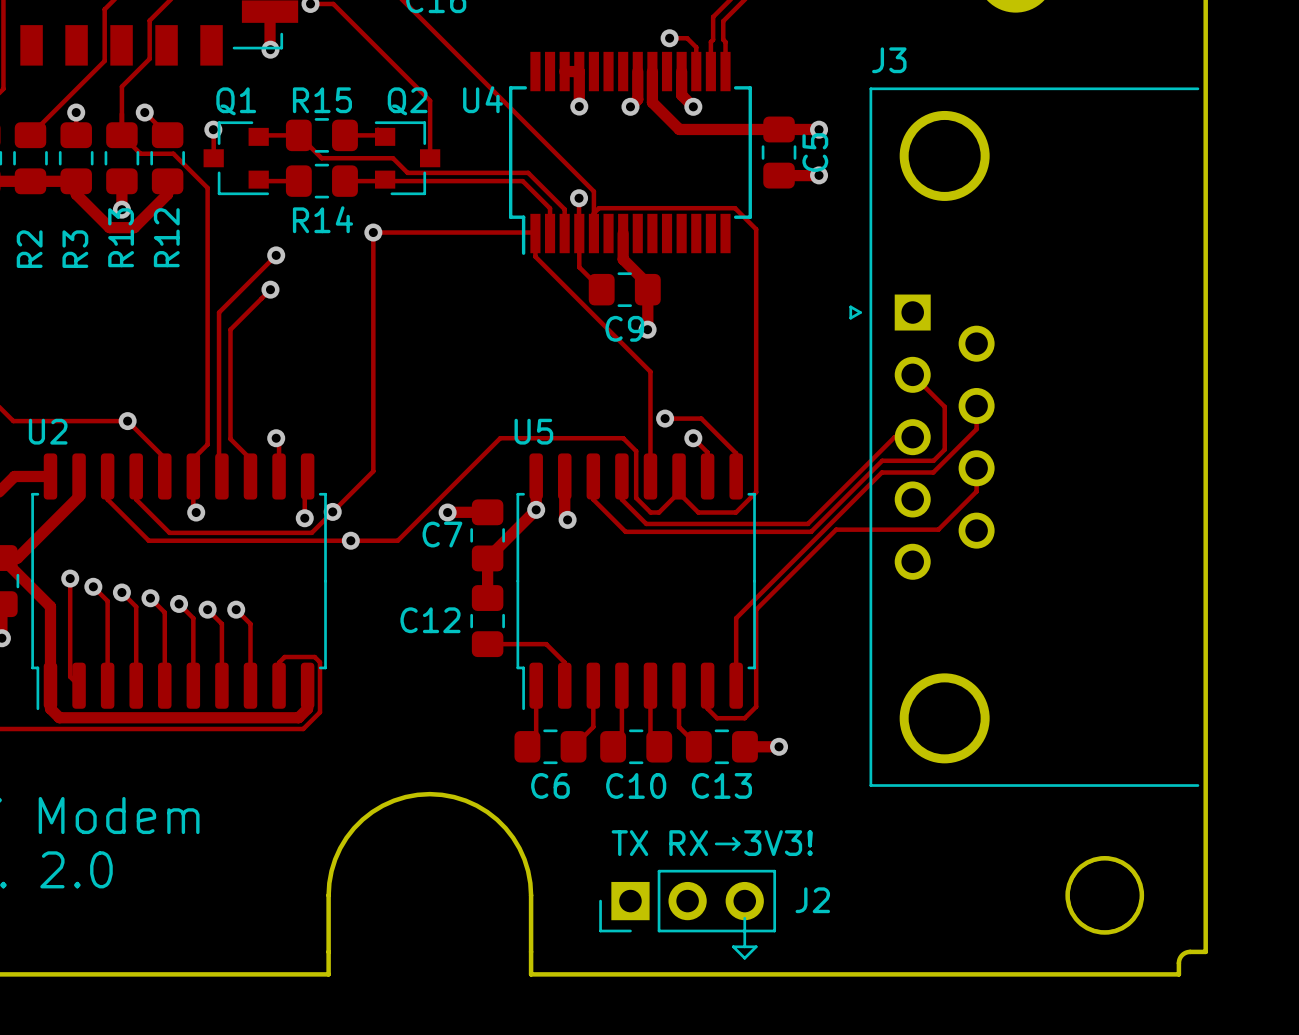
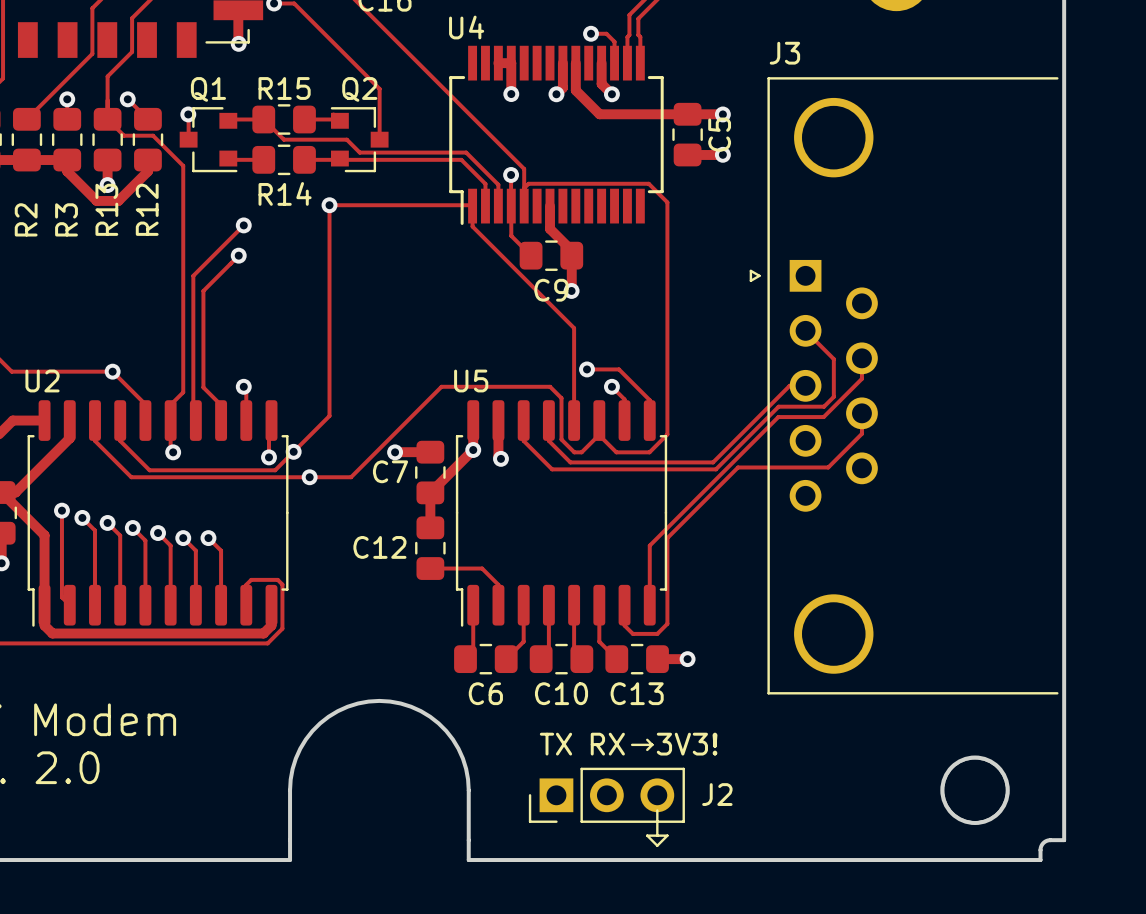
U4 name position: U4 (482, 99) -> U4 (466, 27)

